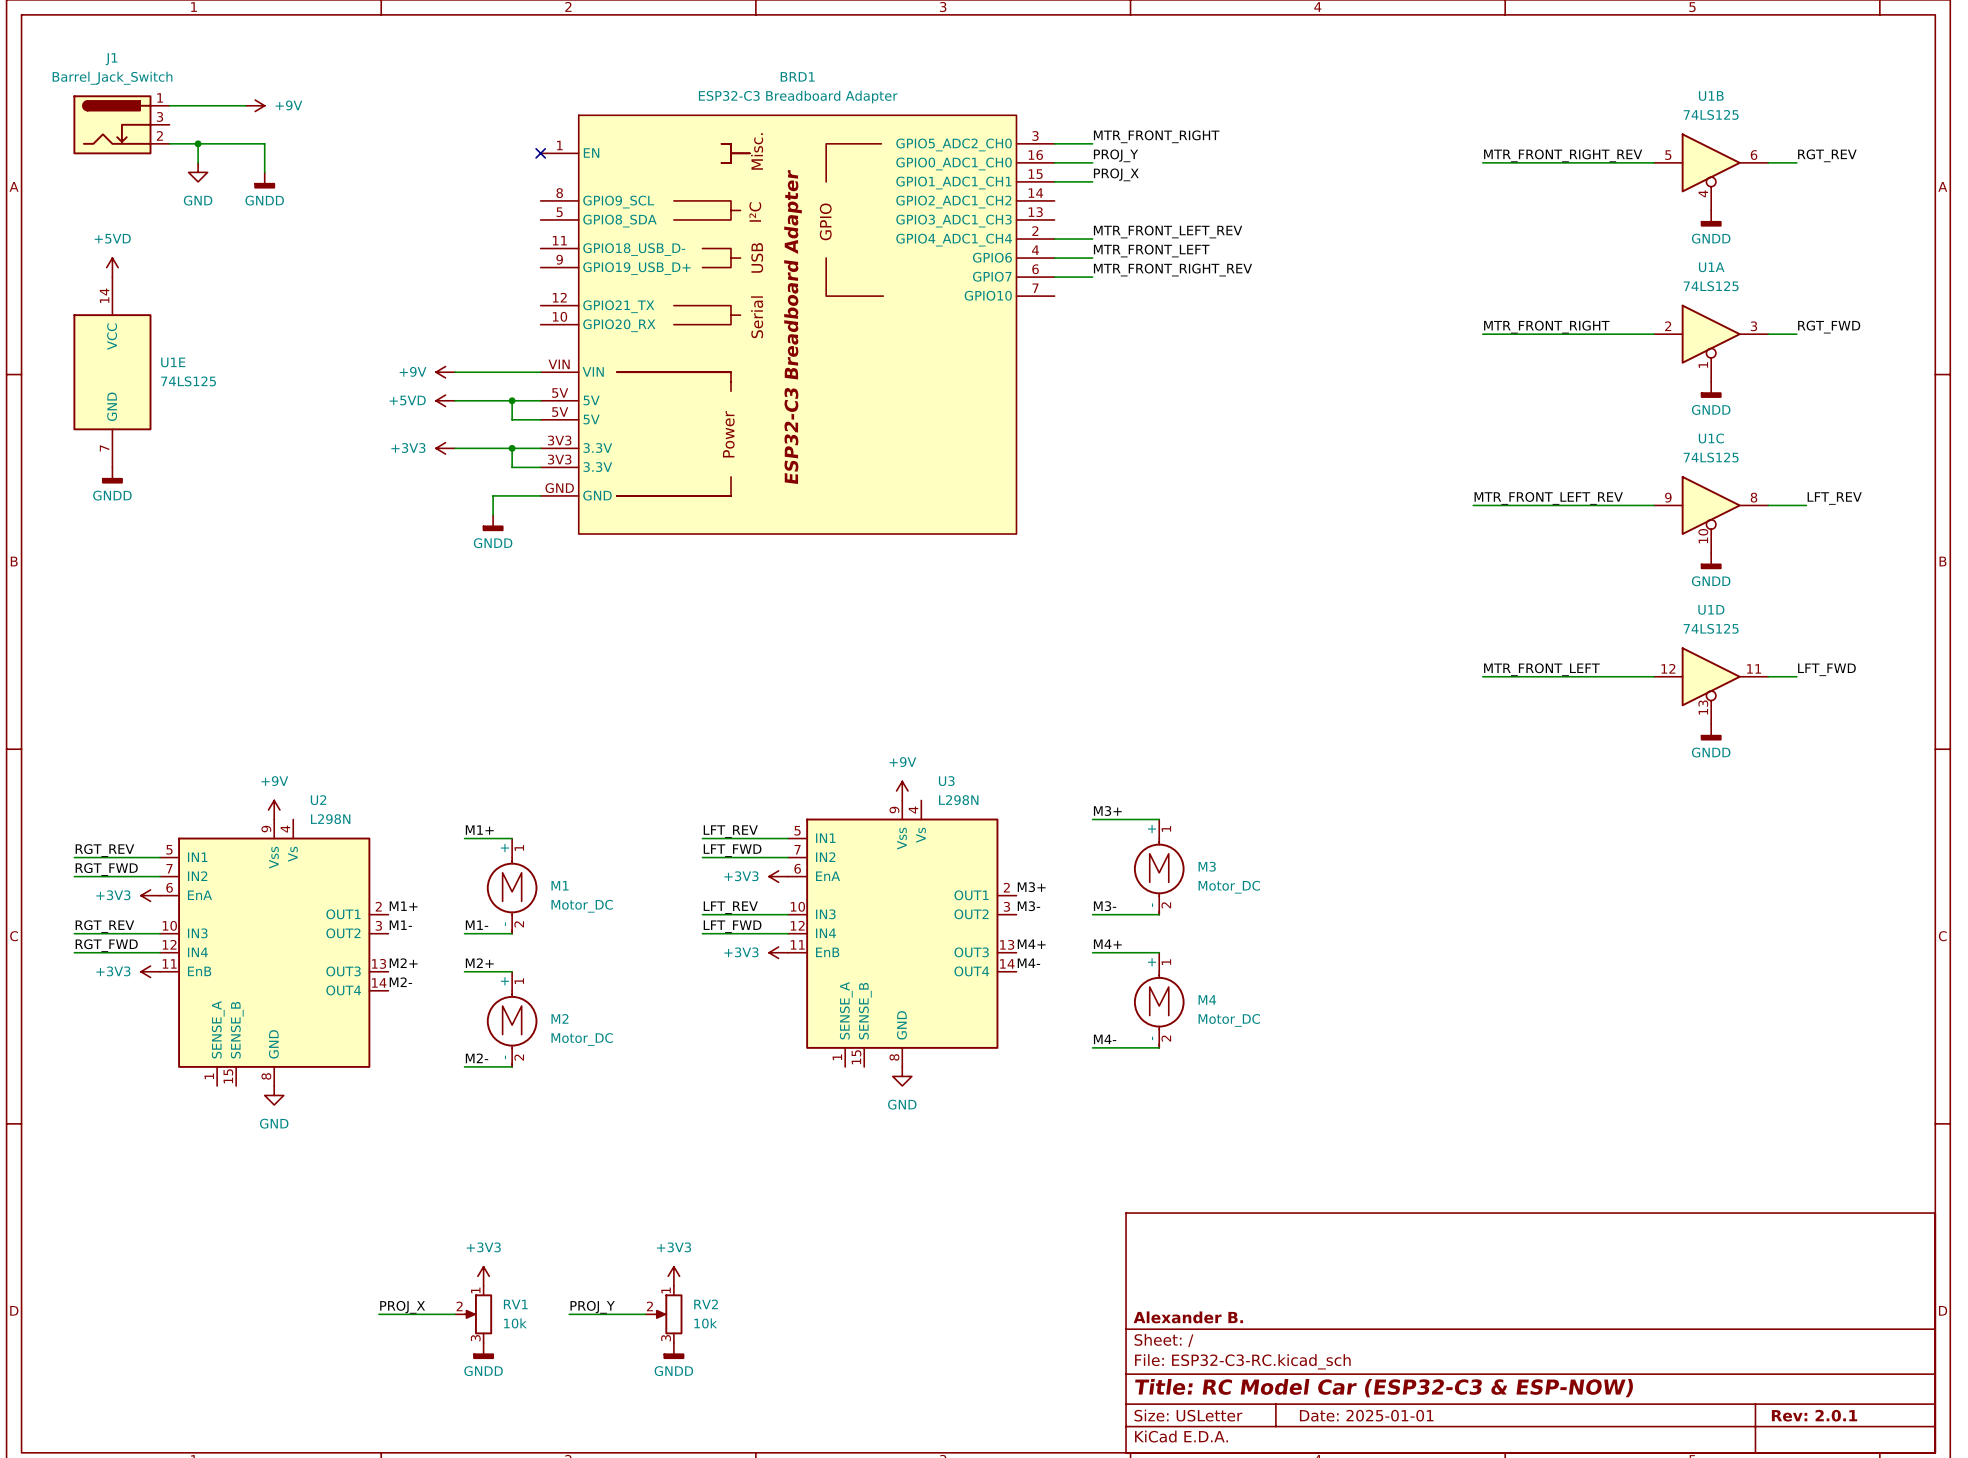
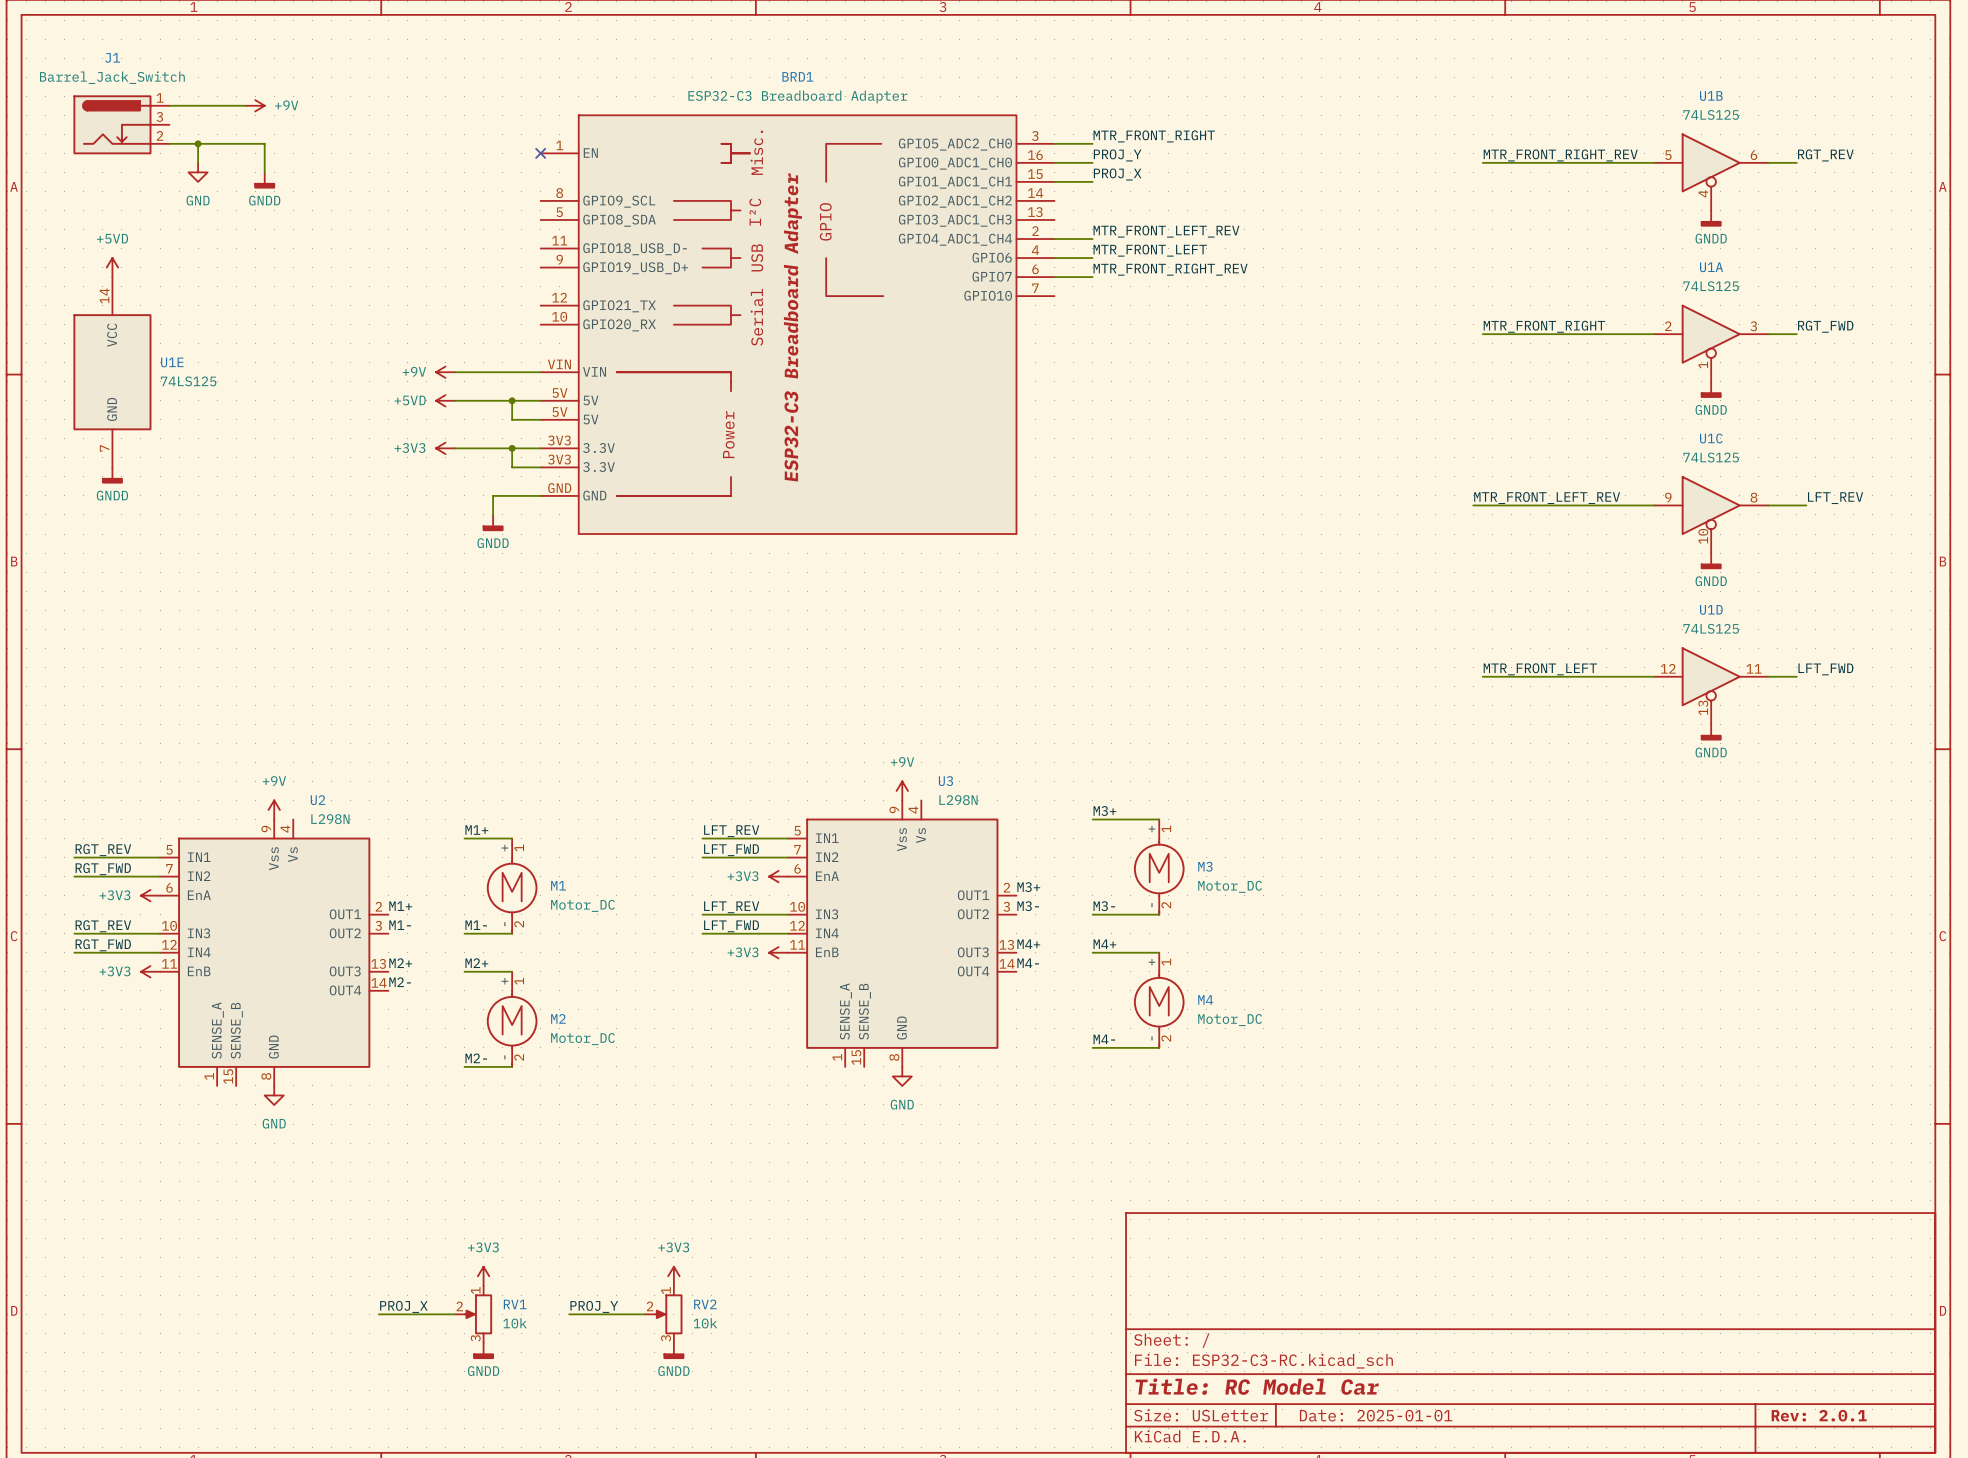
title block: Alexander B. (1188, 1317) -> none
title block: Title: RC Model Car (ESP32-C3 & ESP-NOW) (1384, 1388) -> Title: RC Model Car (1257, 1386)

